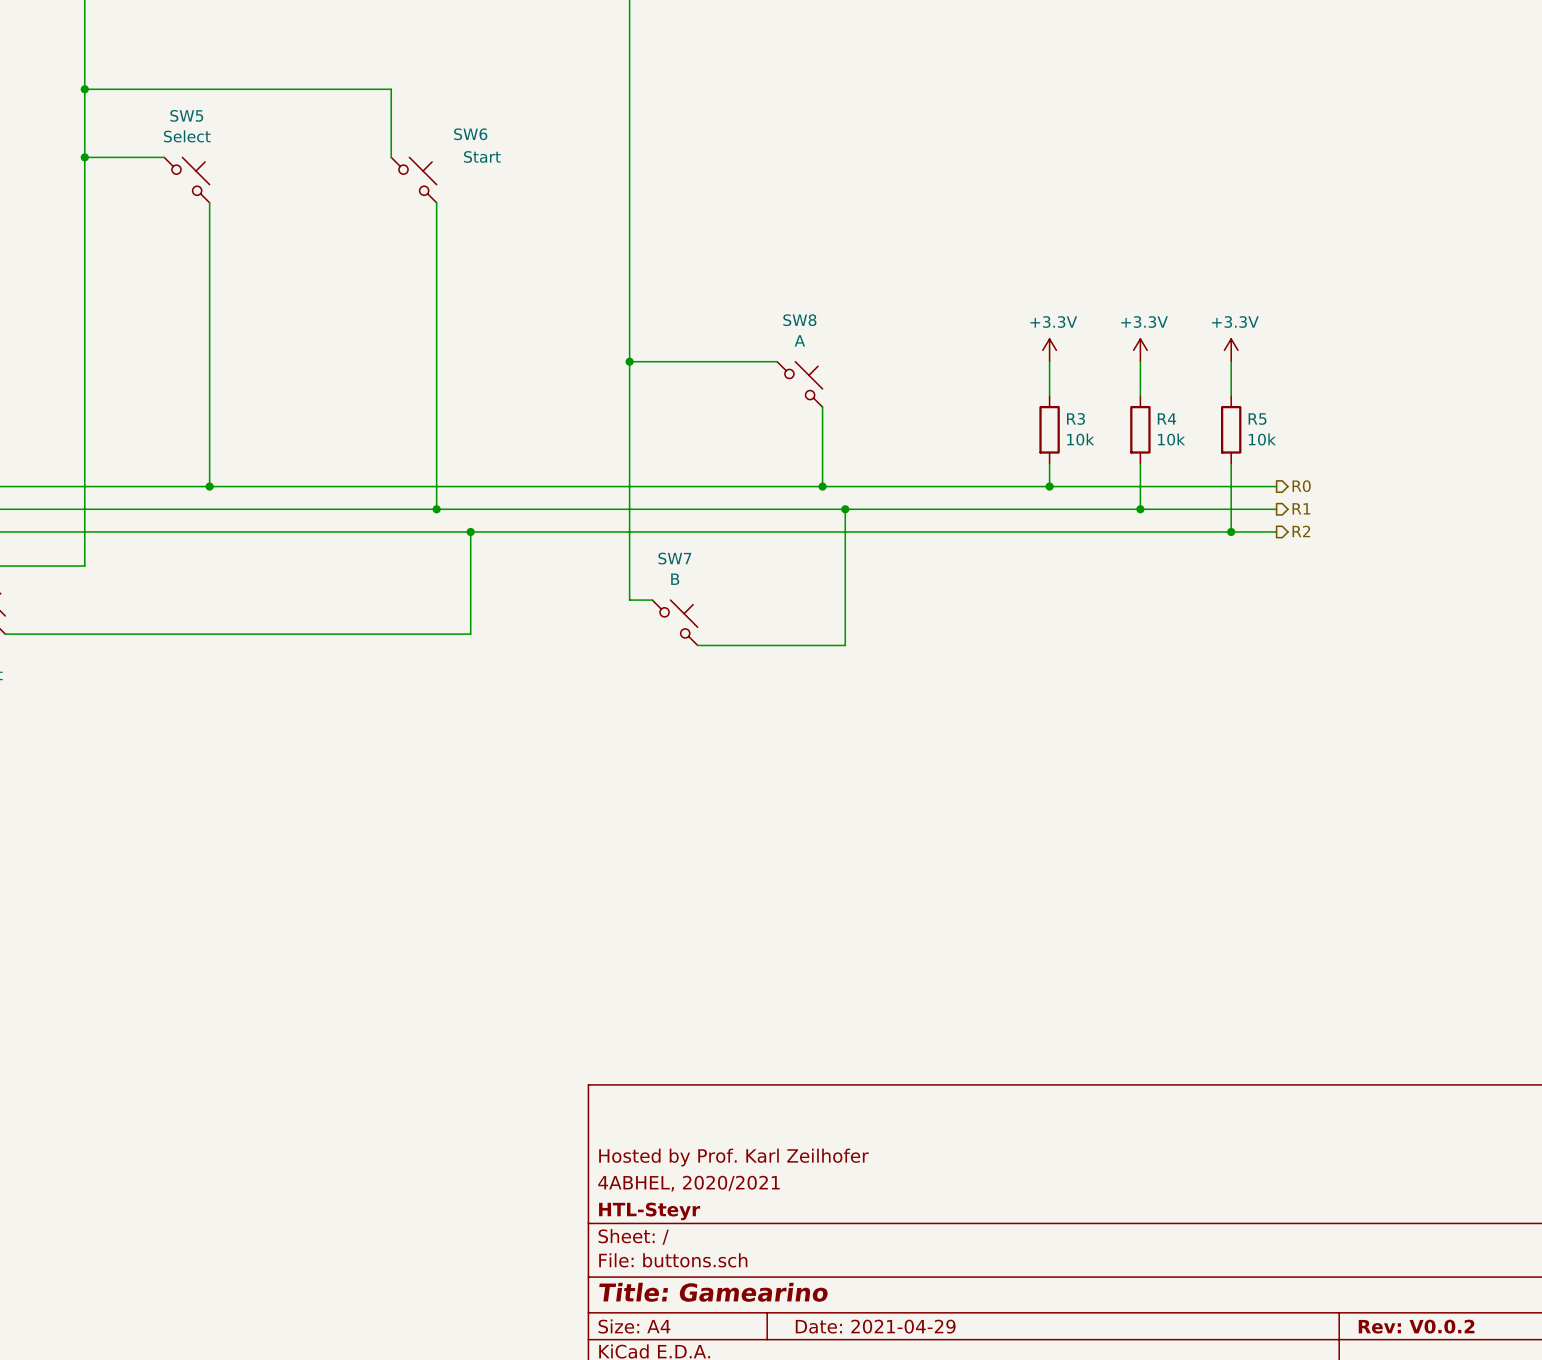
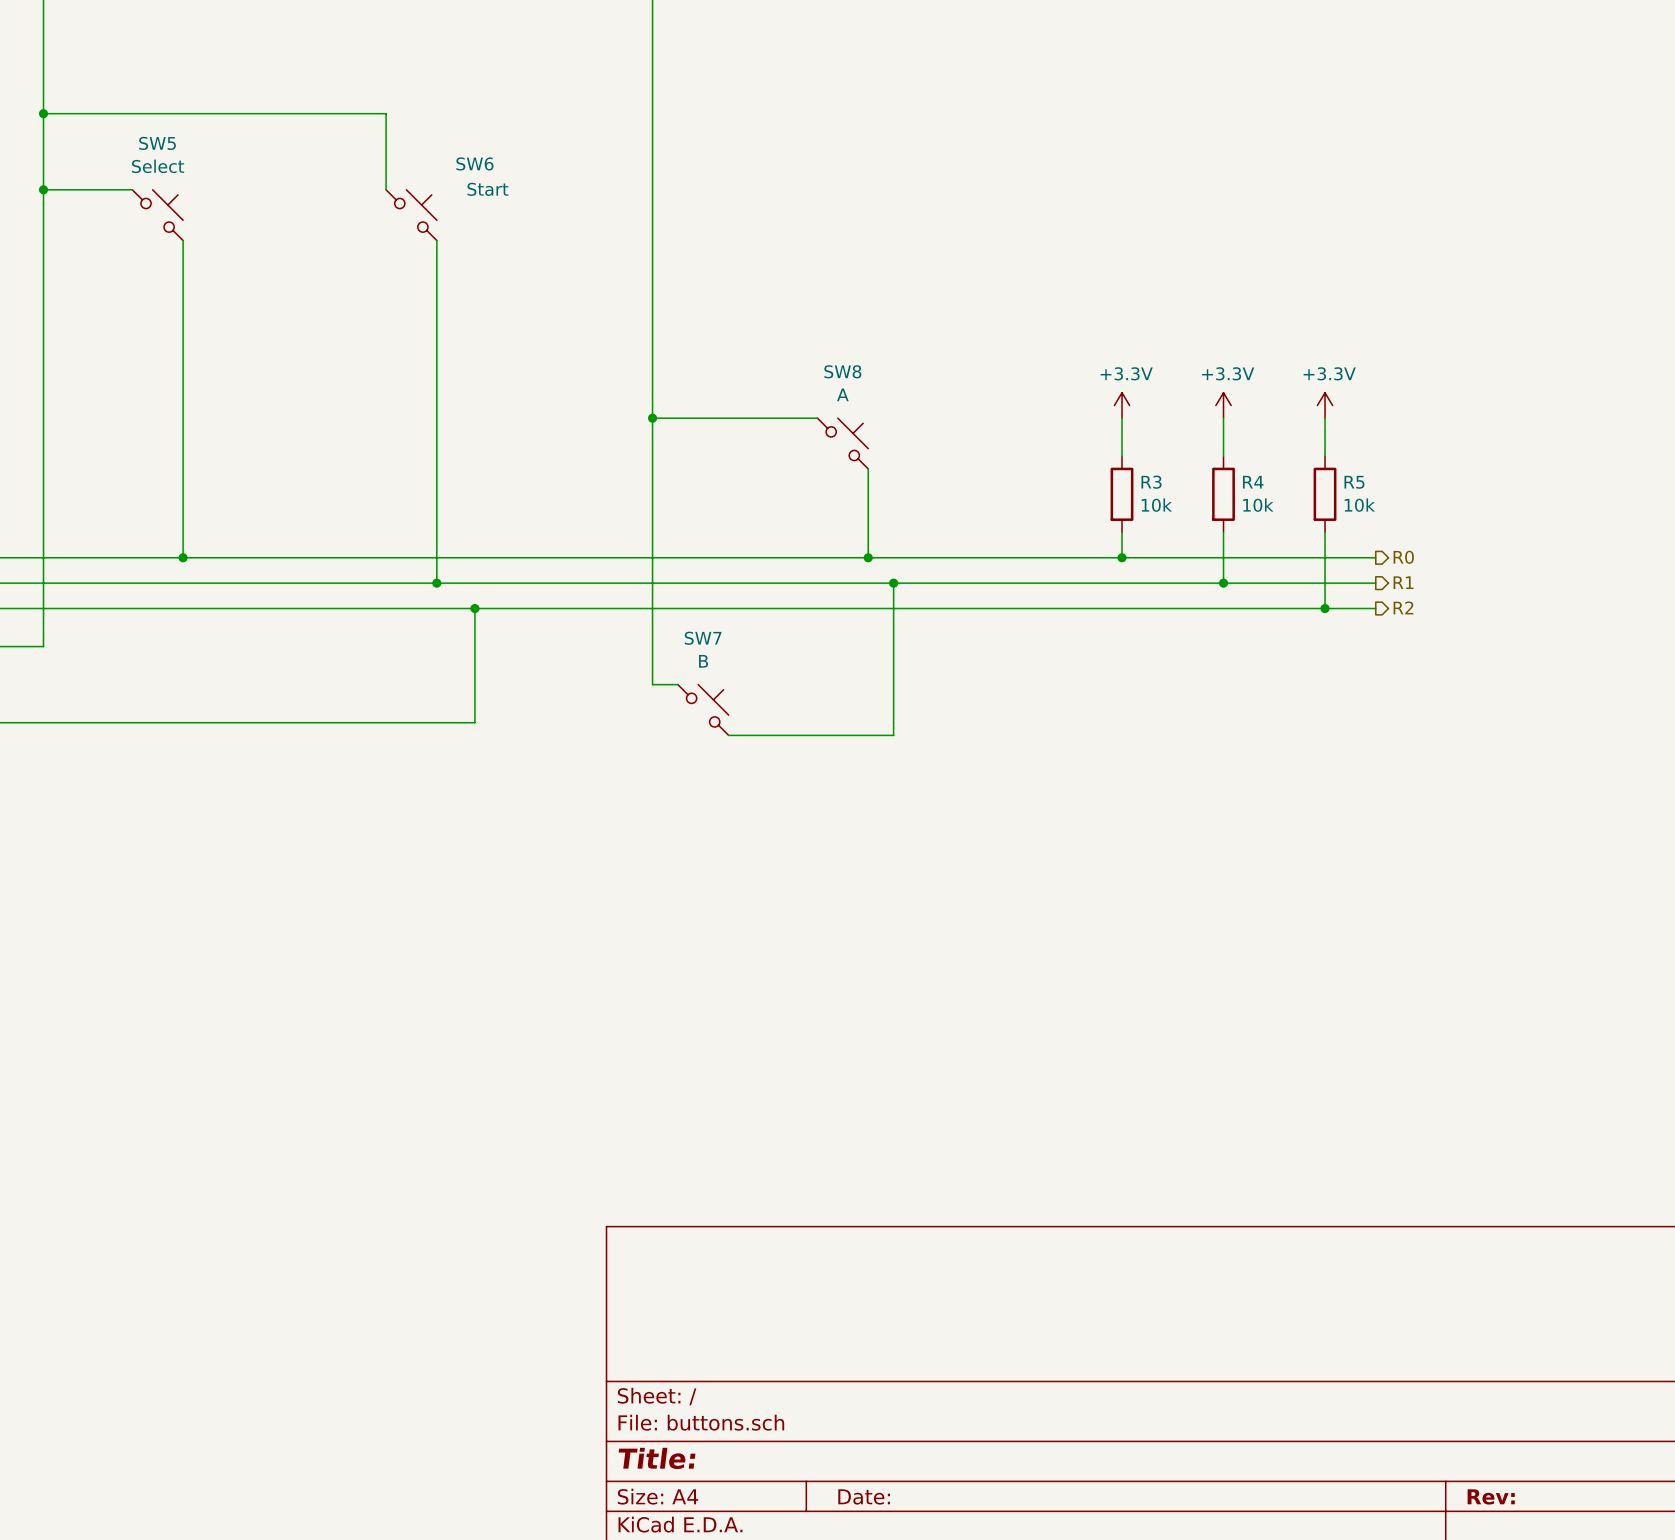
title block: Hosted by Prof. Karl Zeilhofer (733, 1157) -> none
title block: 4ABHEL, 2020/2021 (689, 1183) -> none
title block: HTL-Steyr (649, 1211) -> none
title block: Title: Gamearino (713, 1292) -> Title: (657, 1458)
title block: Date: 2021-04-29 (875, 1326) -> Date: (864, 1496)
title block: Rev: V0.0.2 (1416, 1326) -> Rev: (1491, 1496)

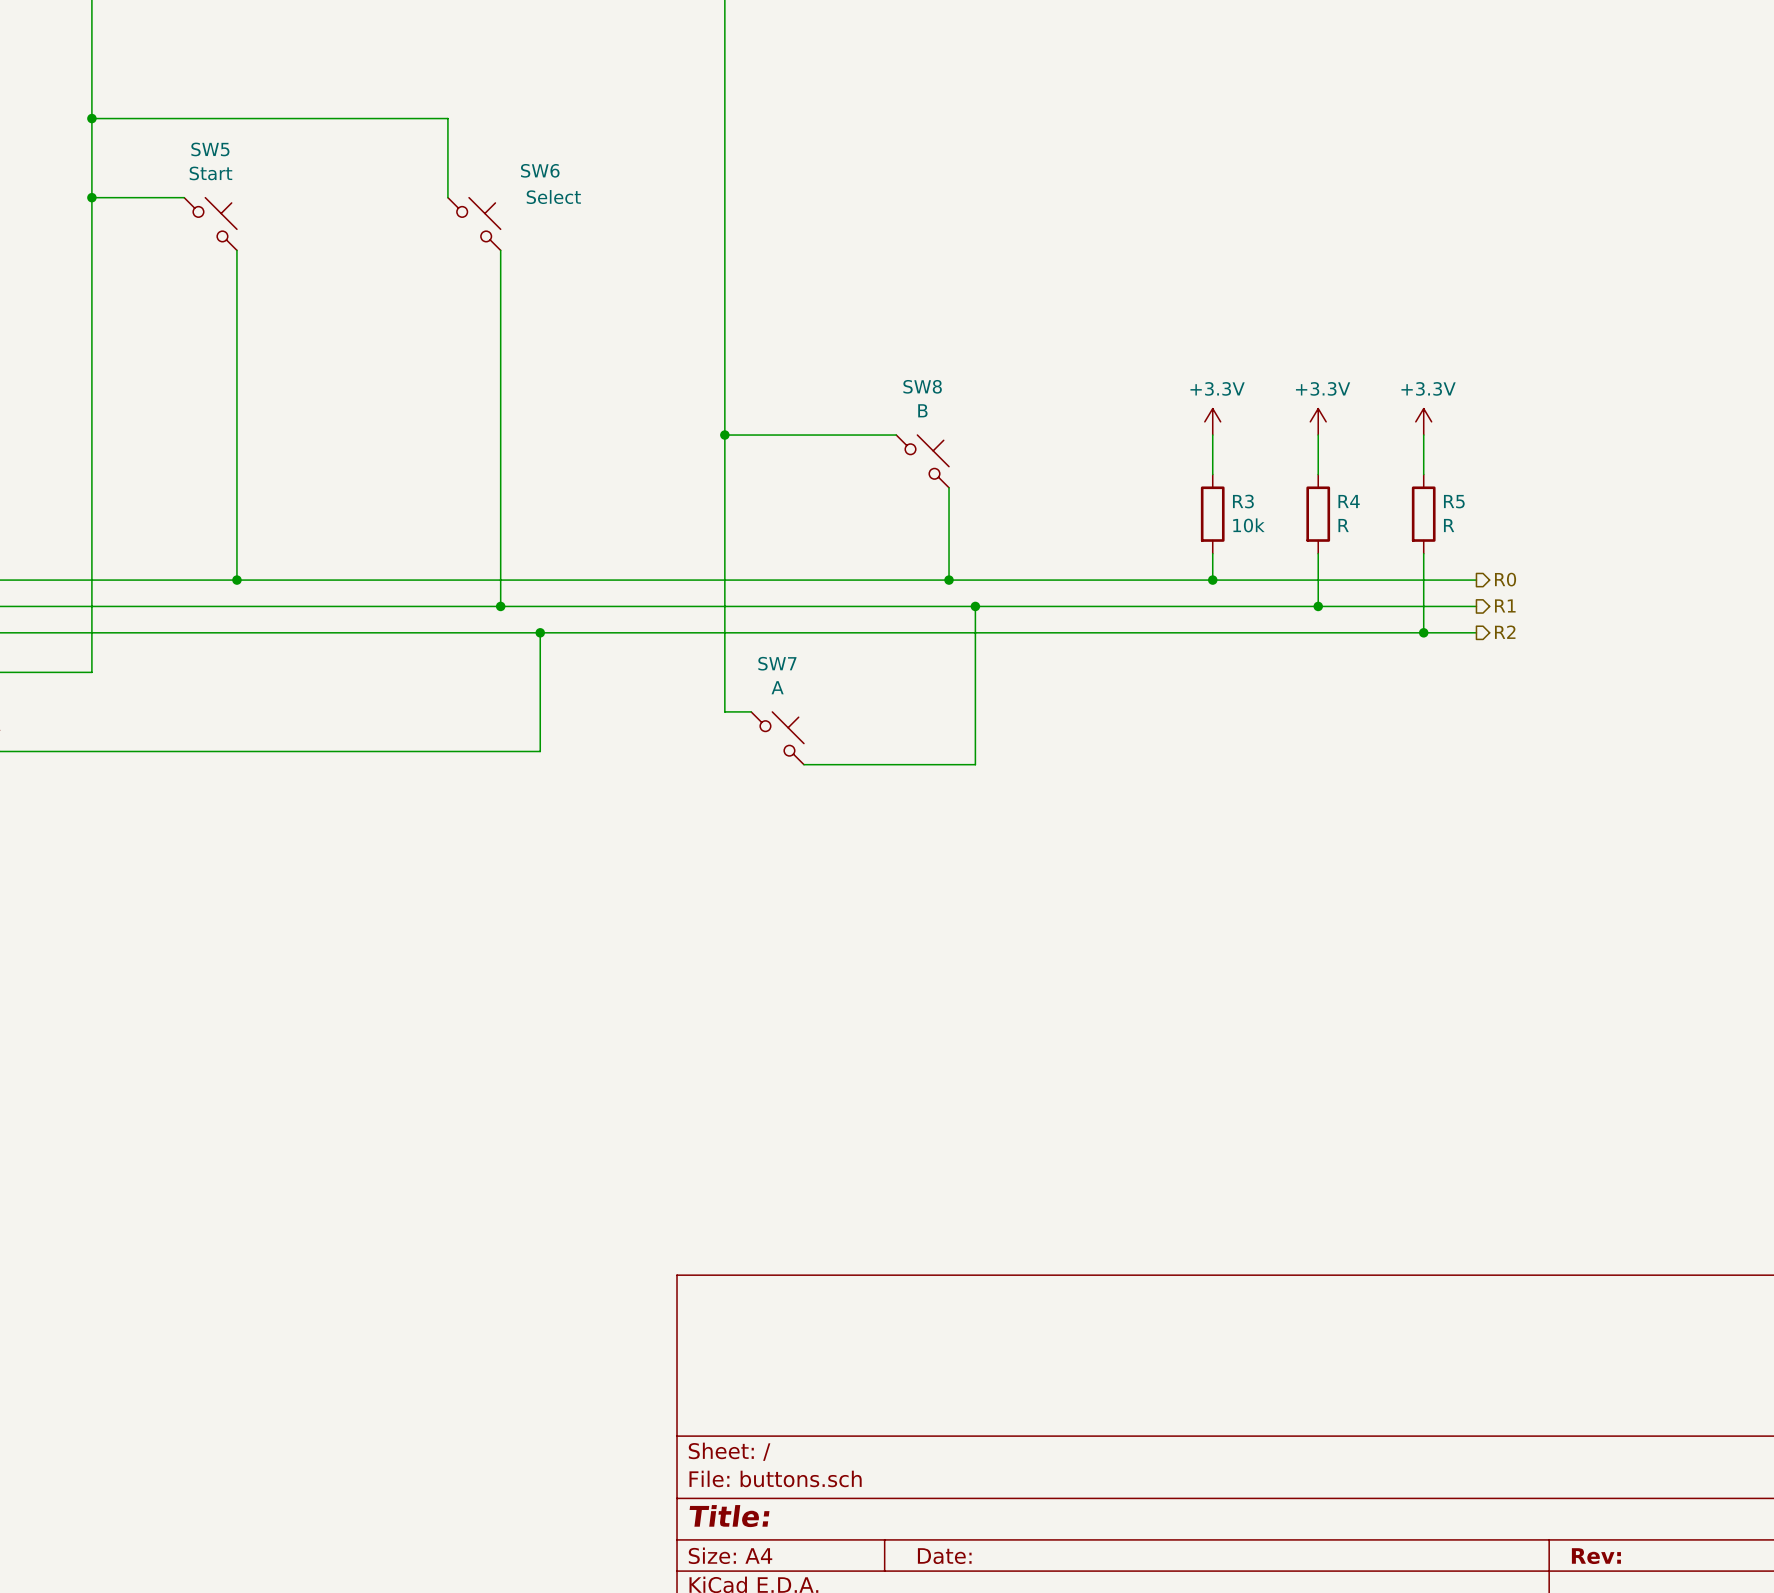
SW5 value: Select (158, 166) -> Start (210, 173)
SW6 value: Start (487, 189) -> Select (553, 197)
SW8 value: A (842, 394) -> B (922, 410)
R4 value: 10k (1258, 505) -> R (1343, 525)
R5 value: 10k (1359, 505) -> R (1449, 525)
SW7 value: B (703, 661) -> A (777, 687)

